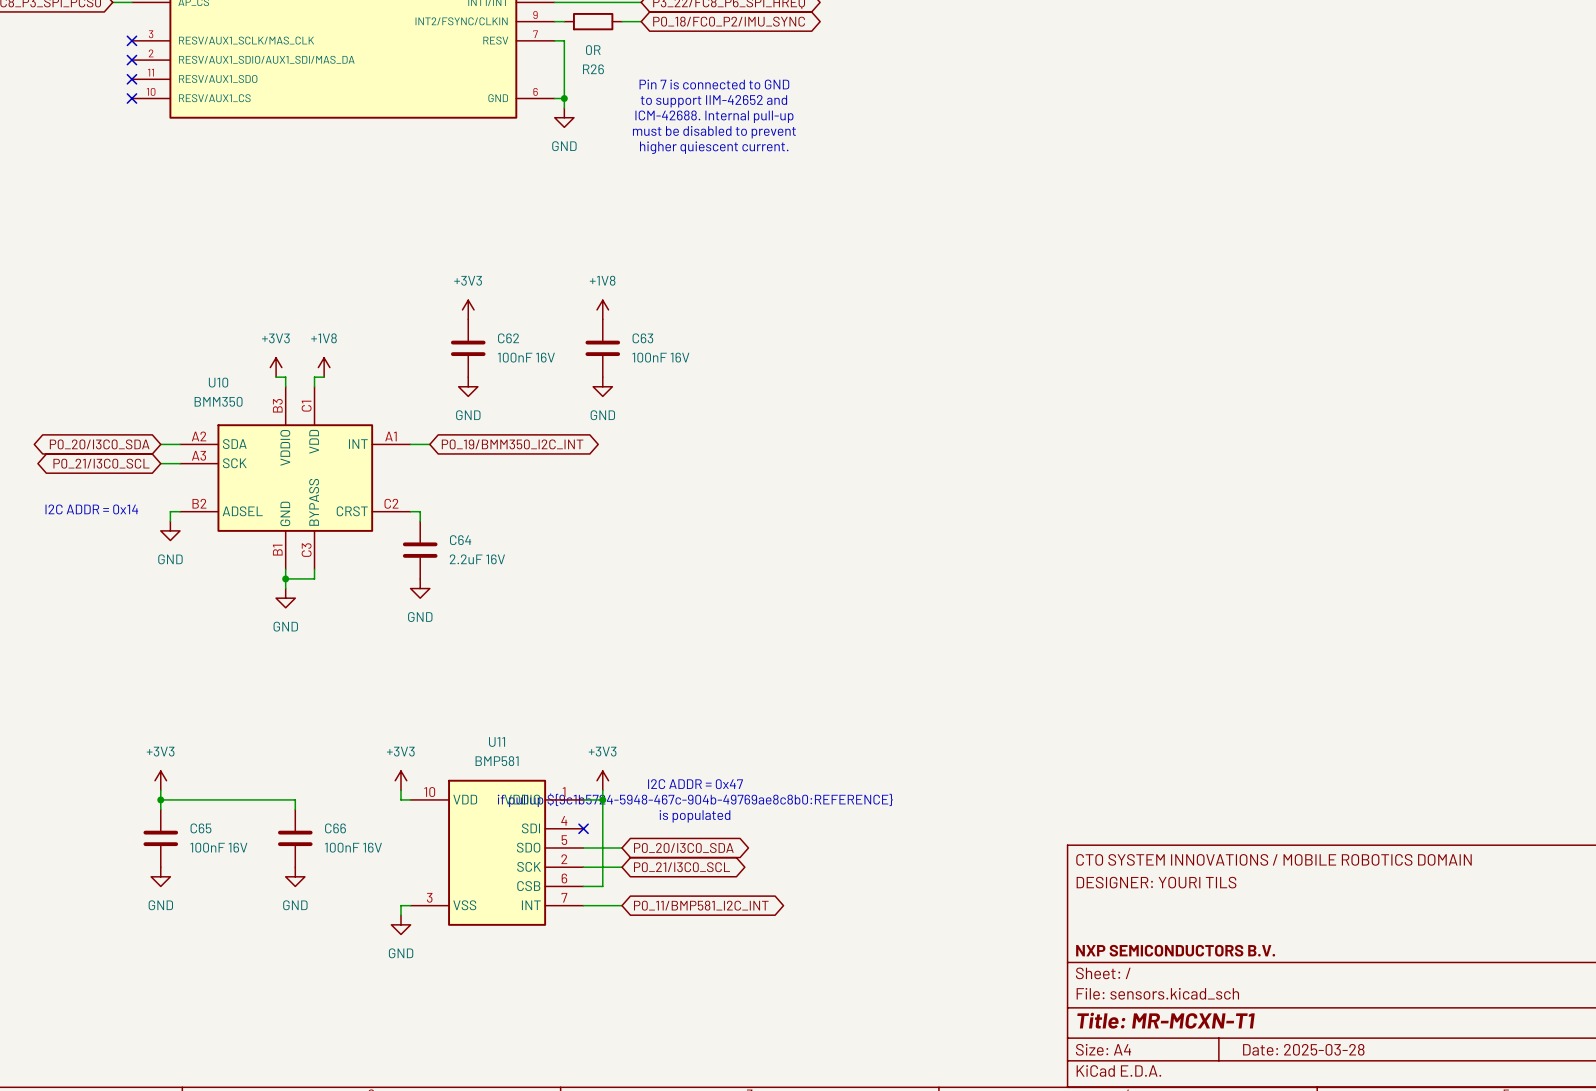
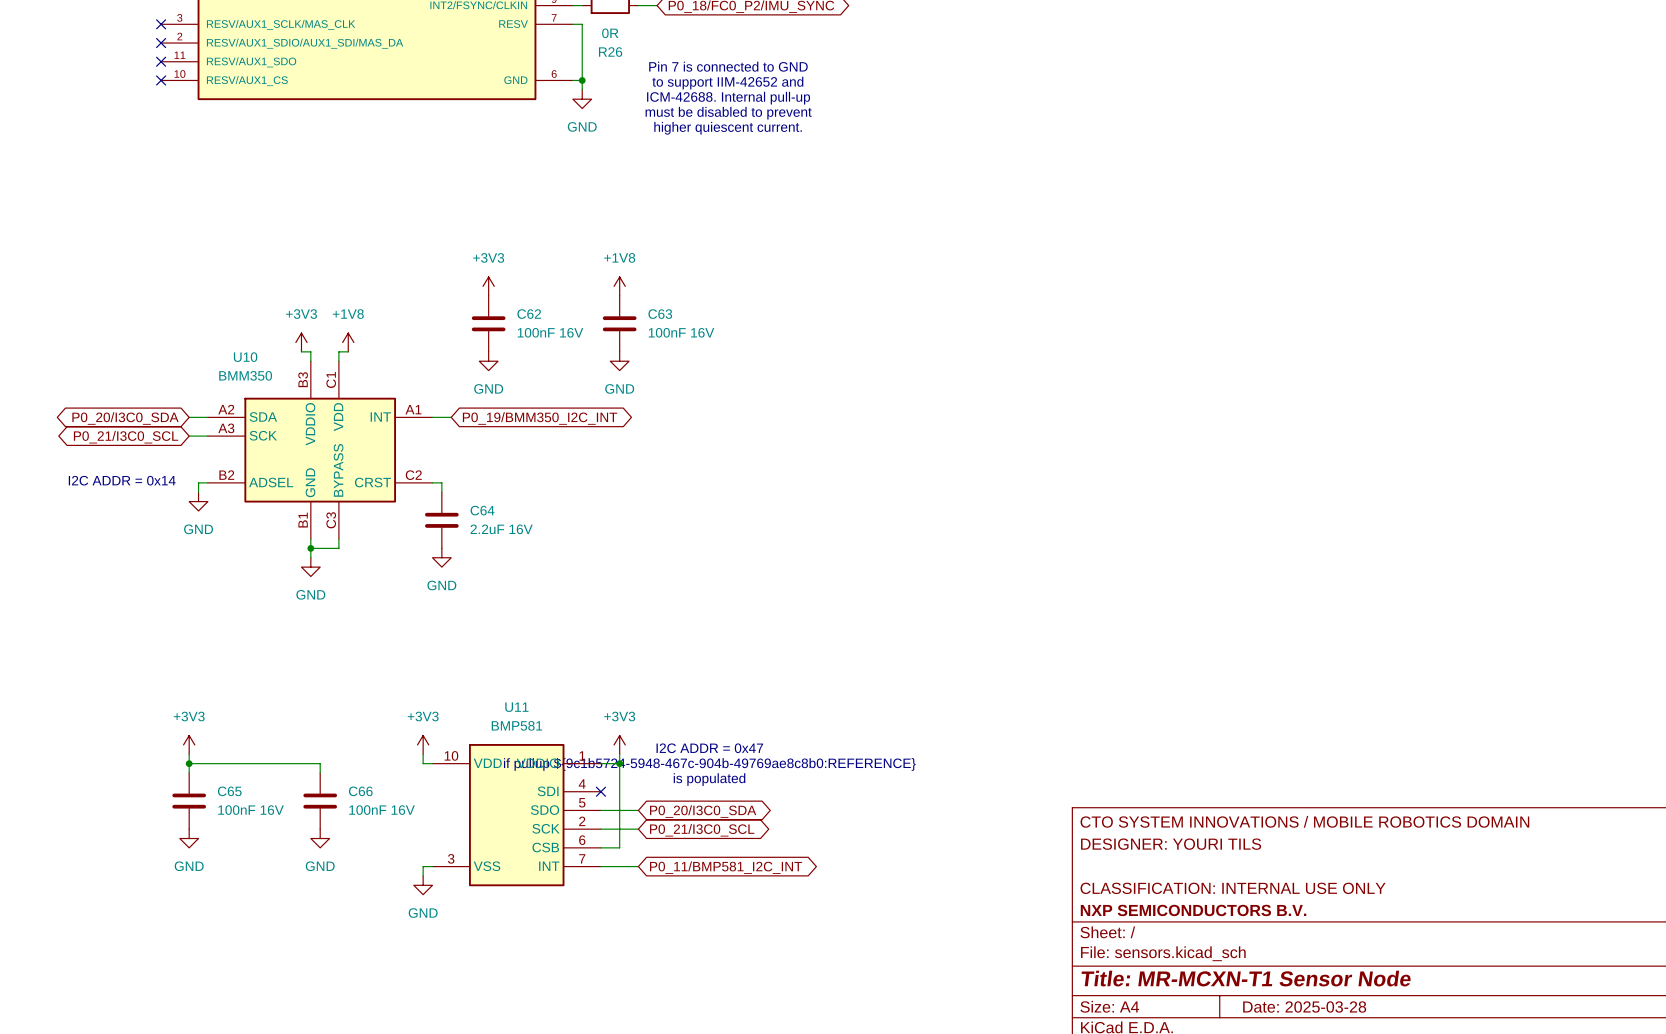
title block: none -> CLASSIFICATION: INTERNAL USE ONLY (1233, 888)
title block: Title: MR-MCXN-T1 (1166, 1020) -> Title: MR-MCXN-T1 Sensor Node (1246, 978)

